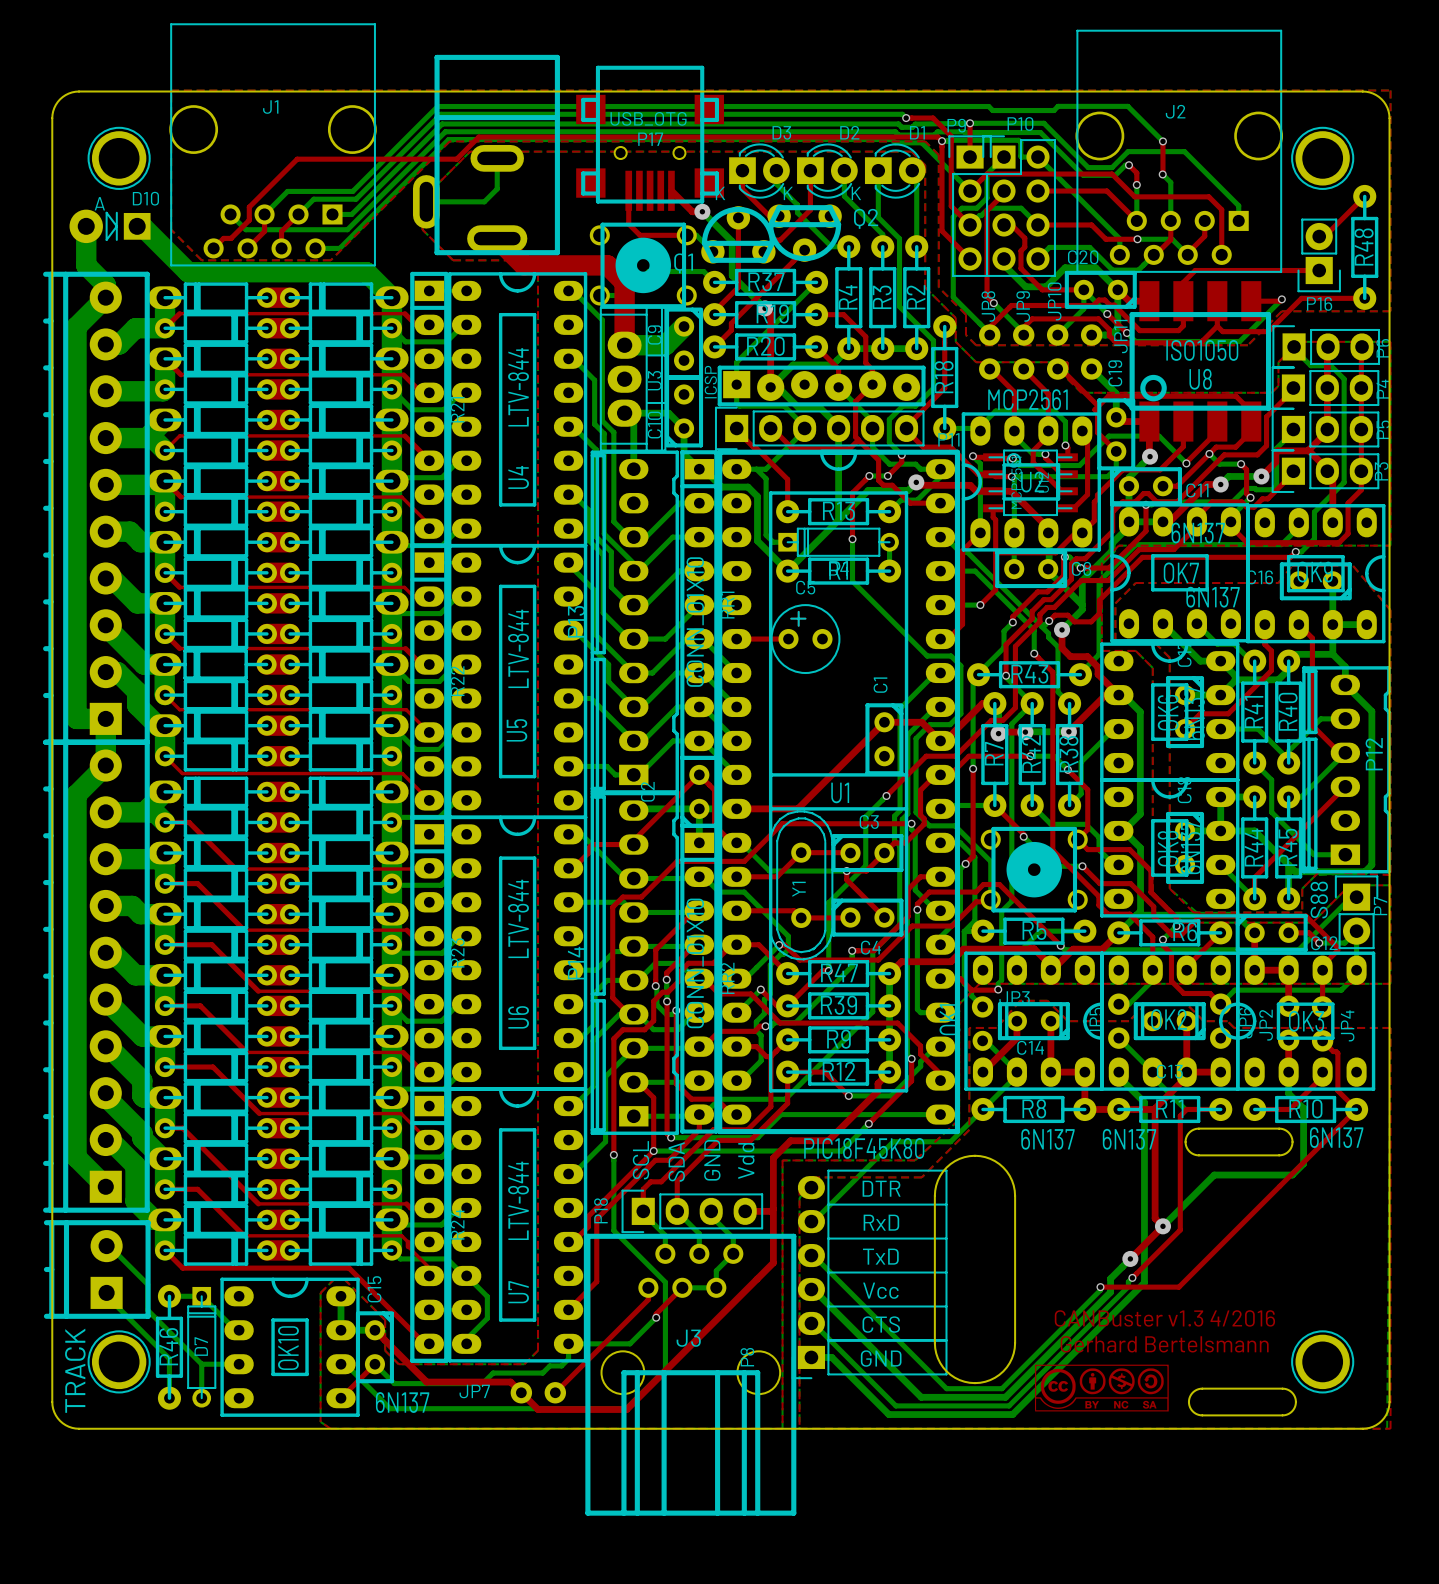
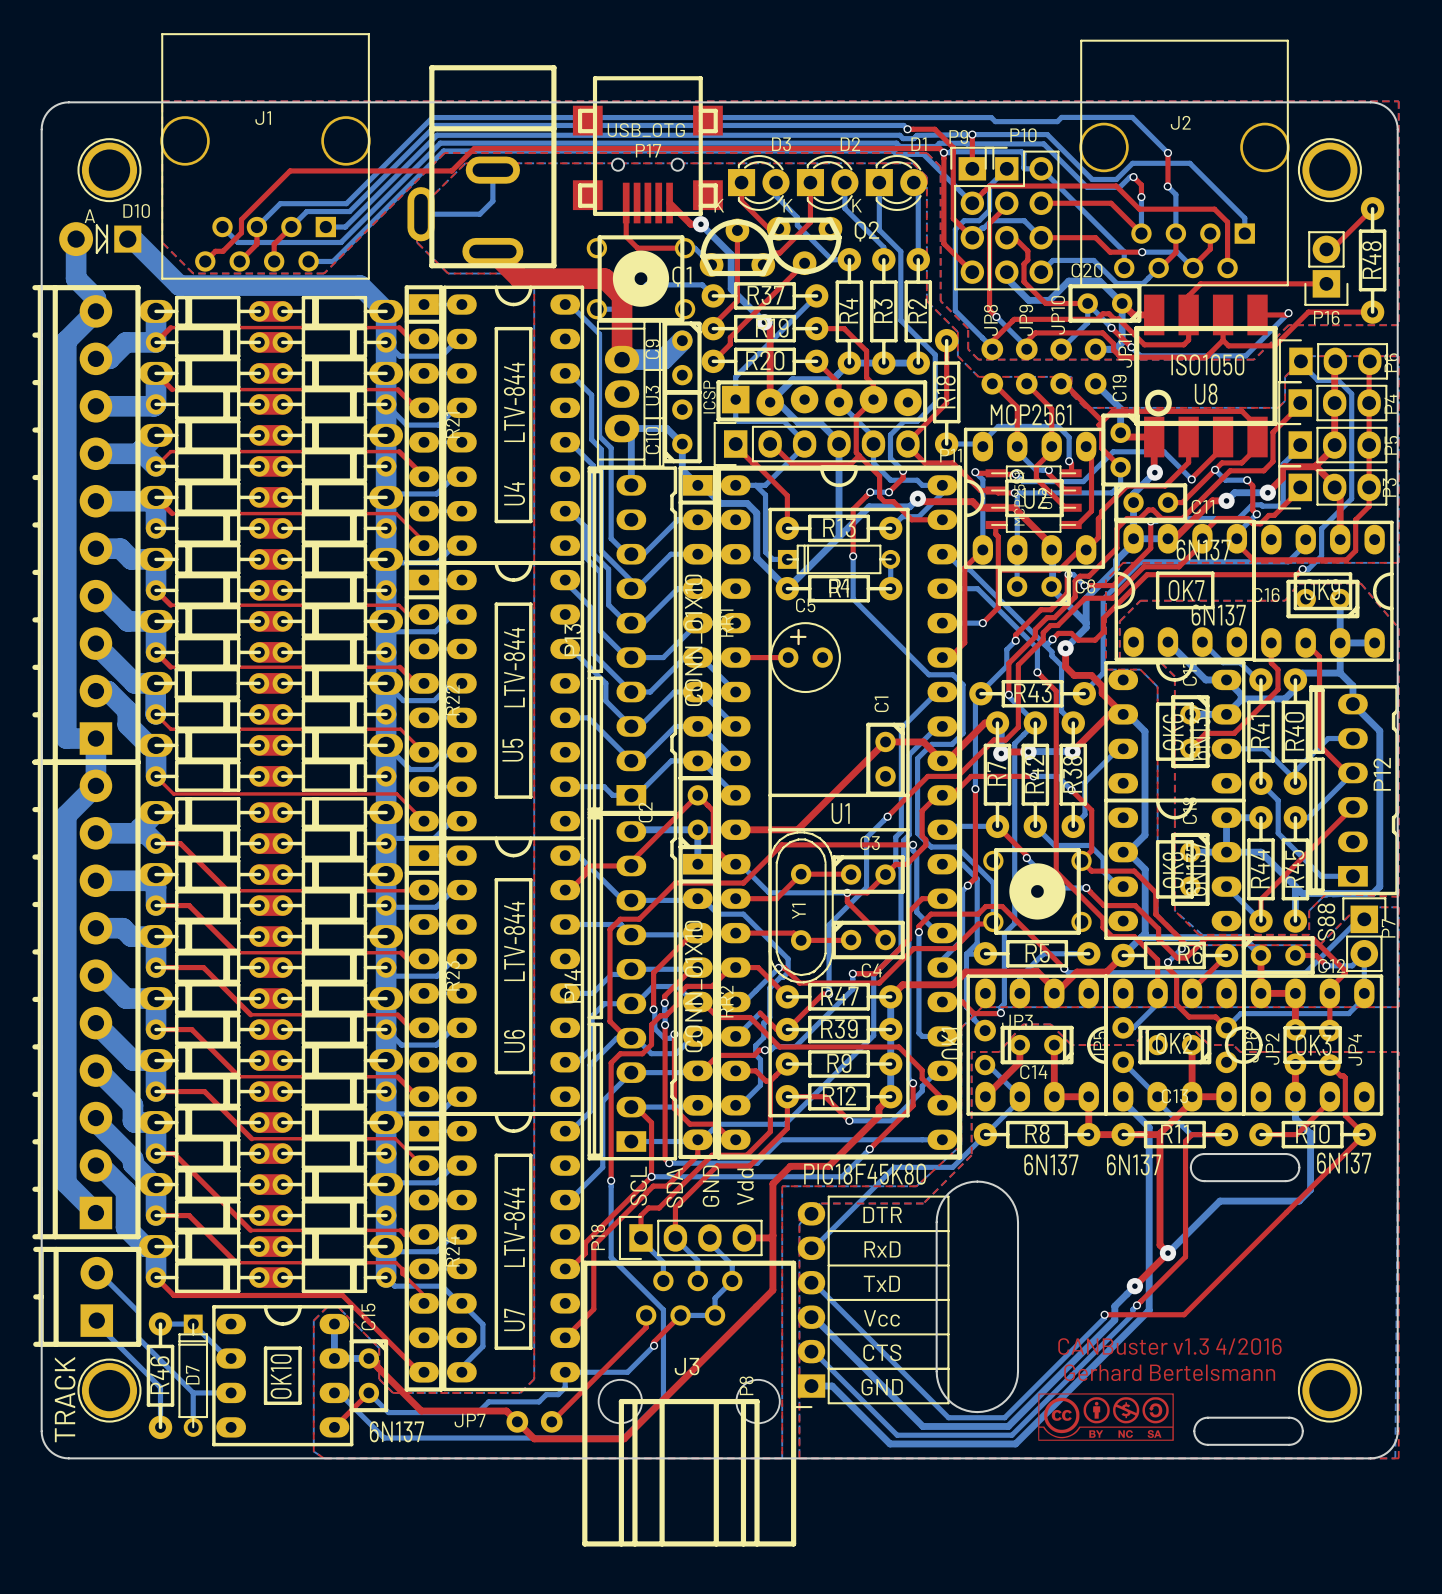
via: (760, 989) -> none

